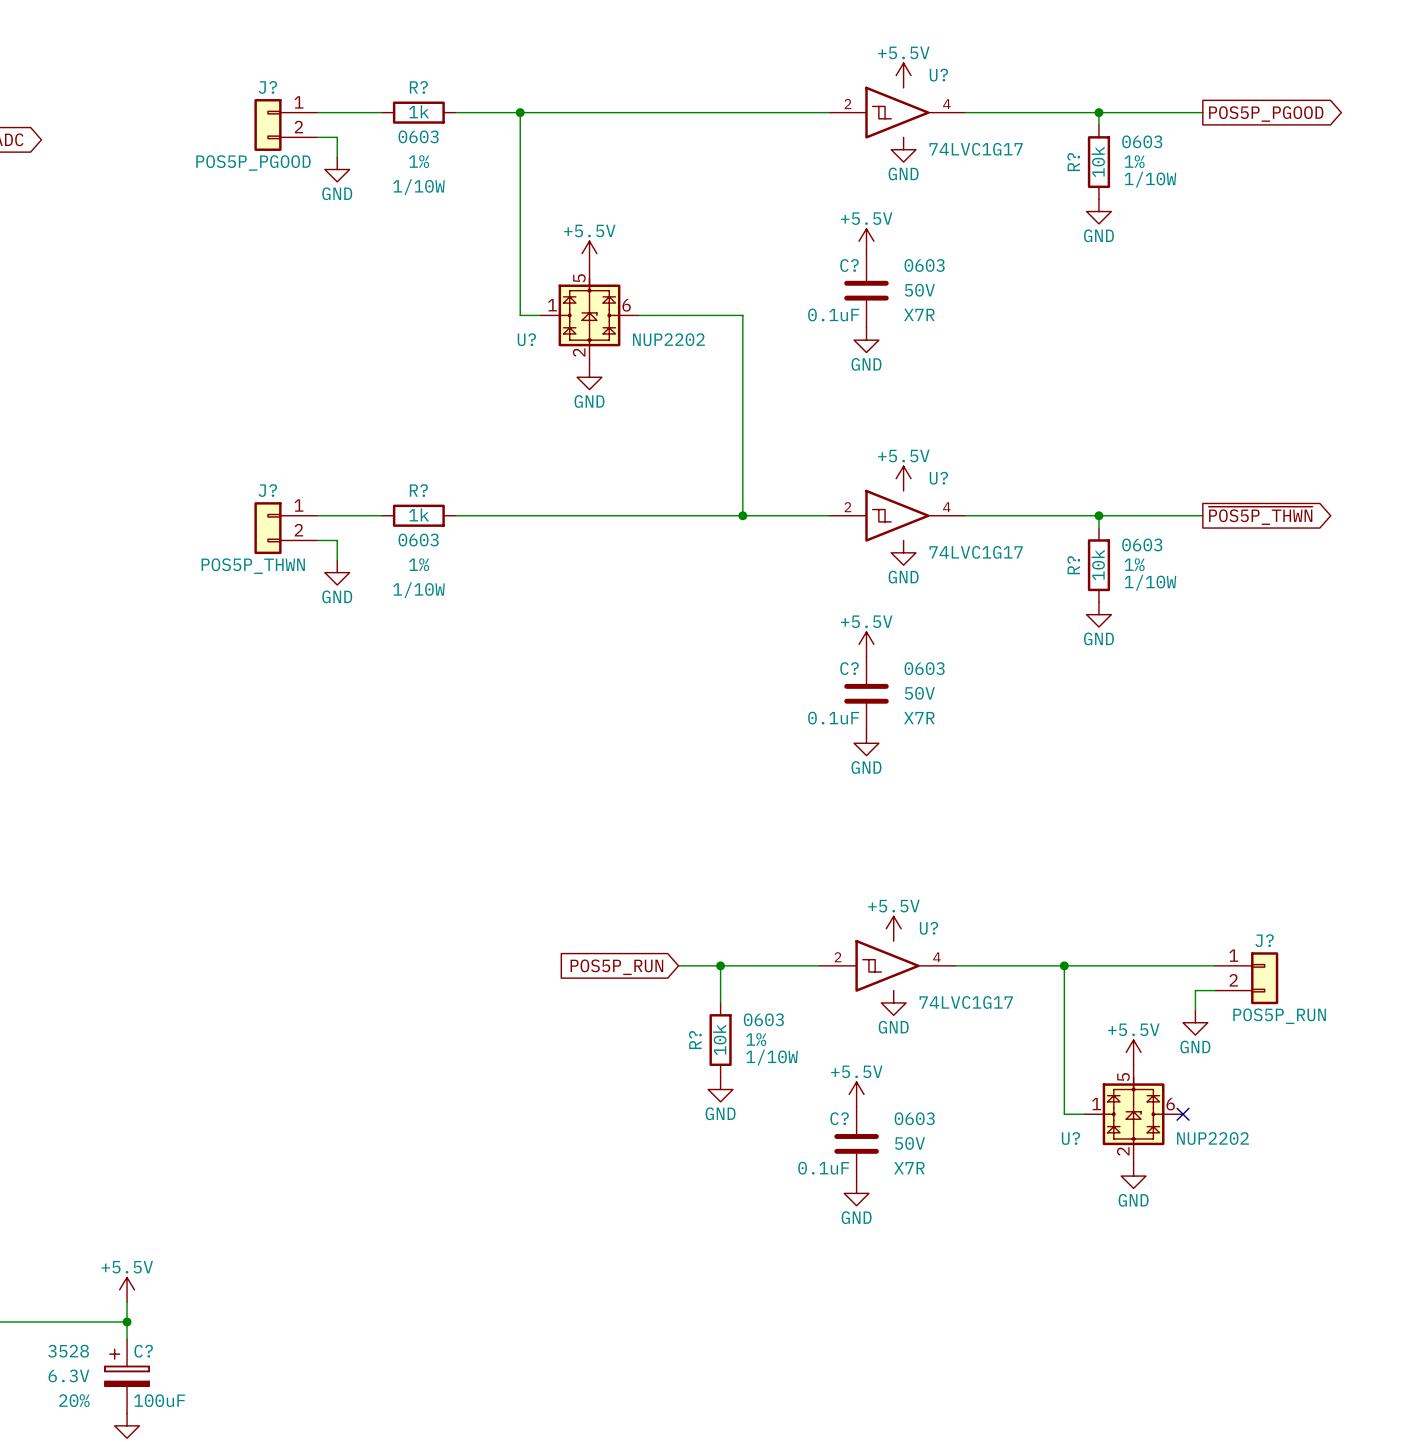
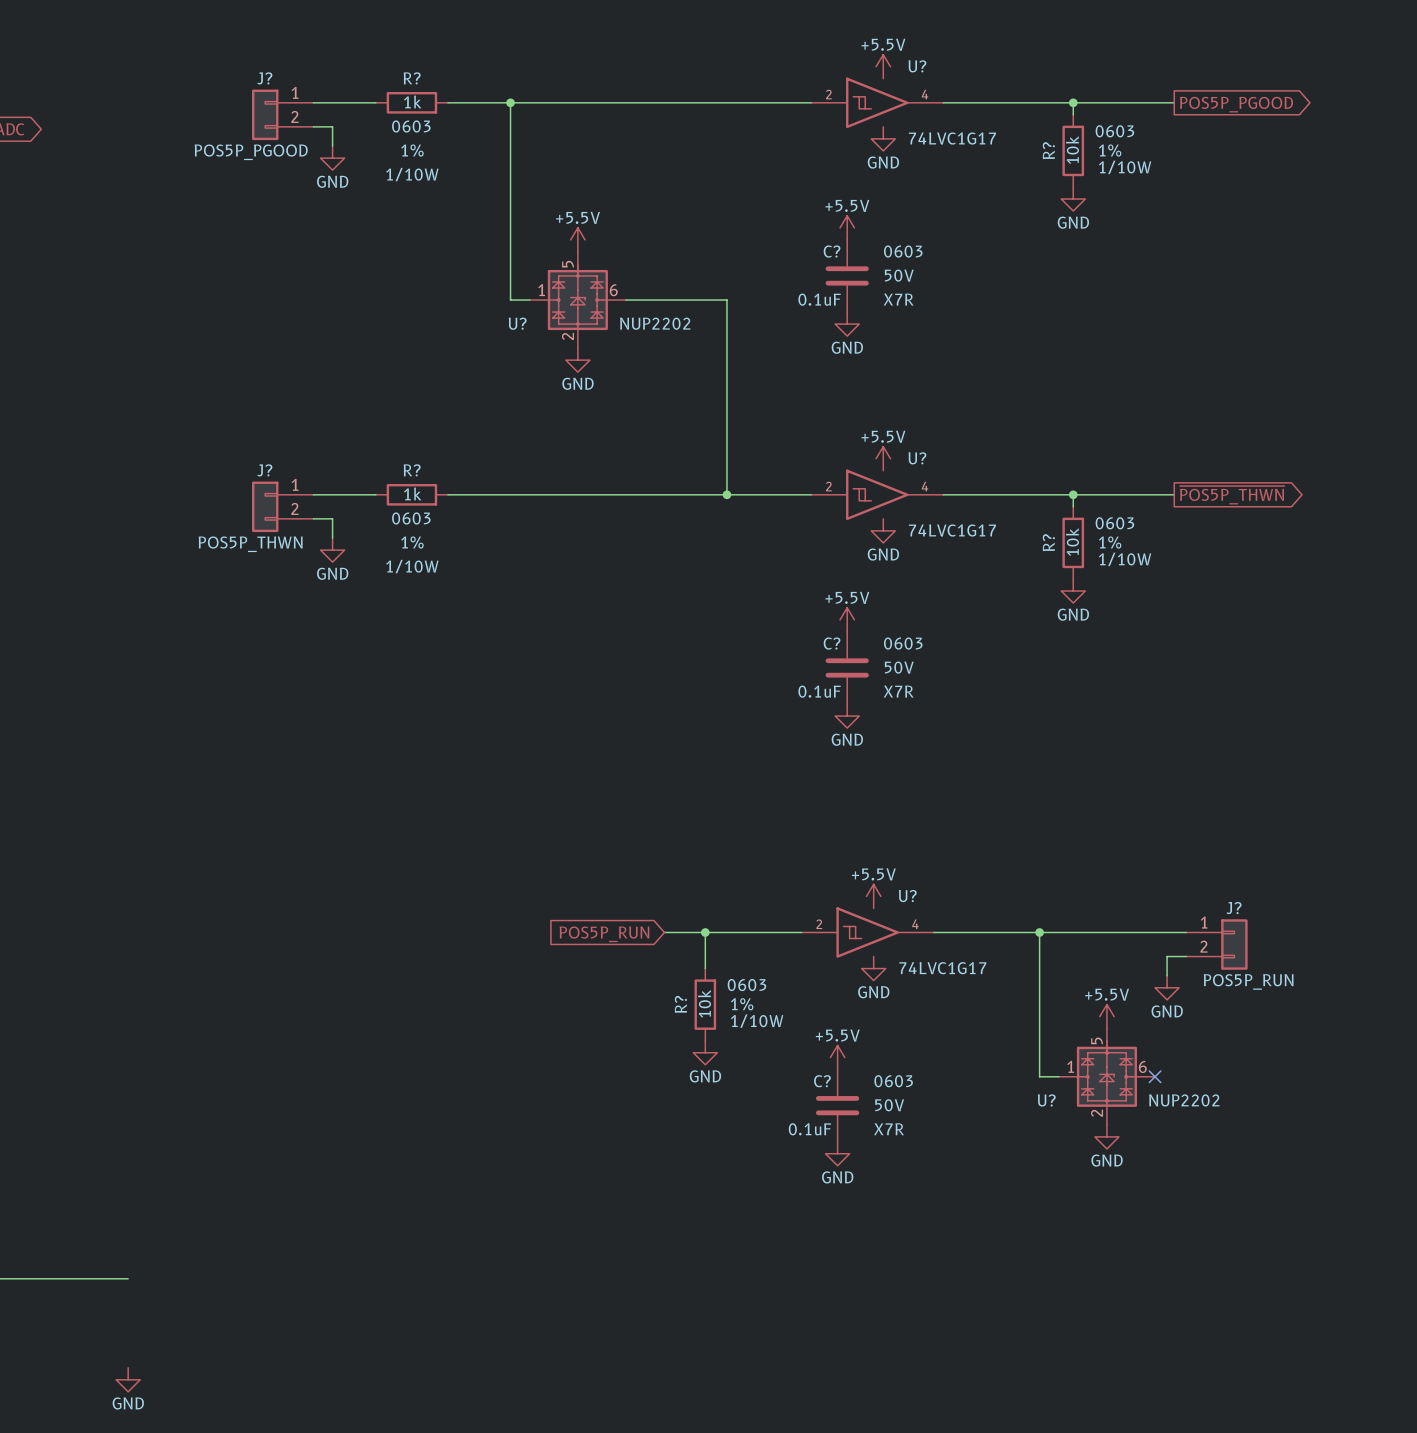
power symbol: +5.5V (127, 1289) -> none
wire: (127, 1302) (127, 1339) -> none
junction: (127, 1321) -> none
C?: 100uF (127, 1376) -> none

